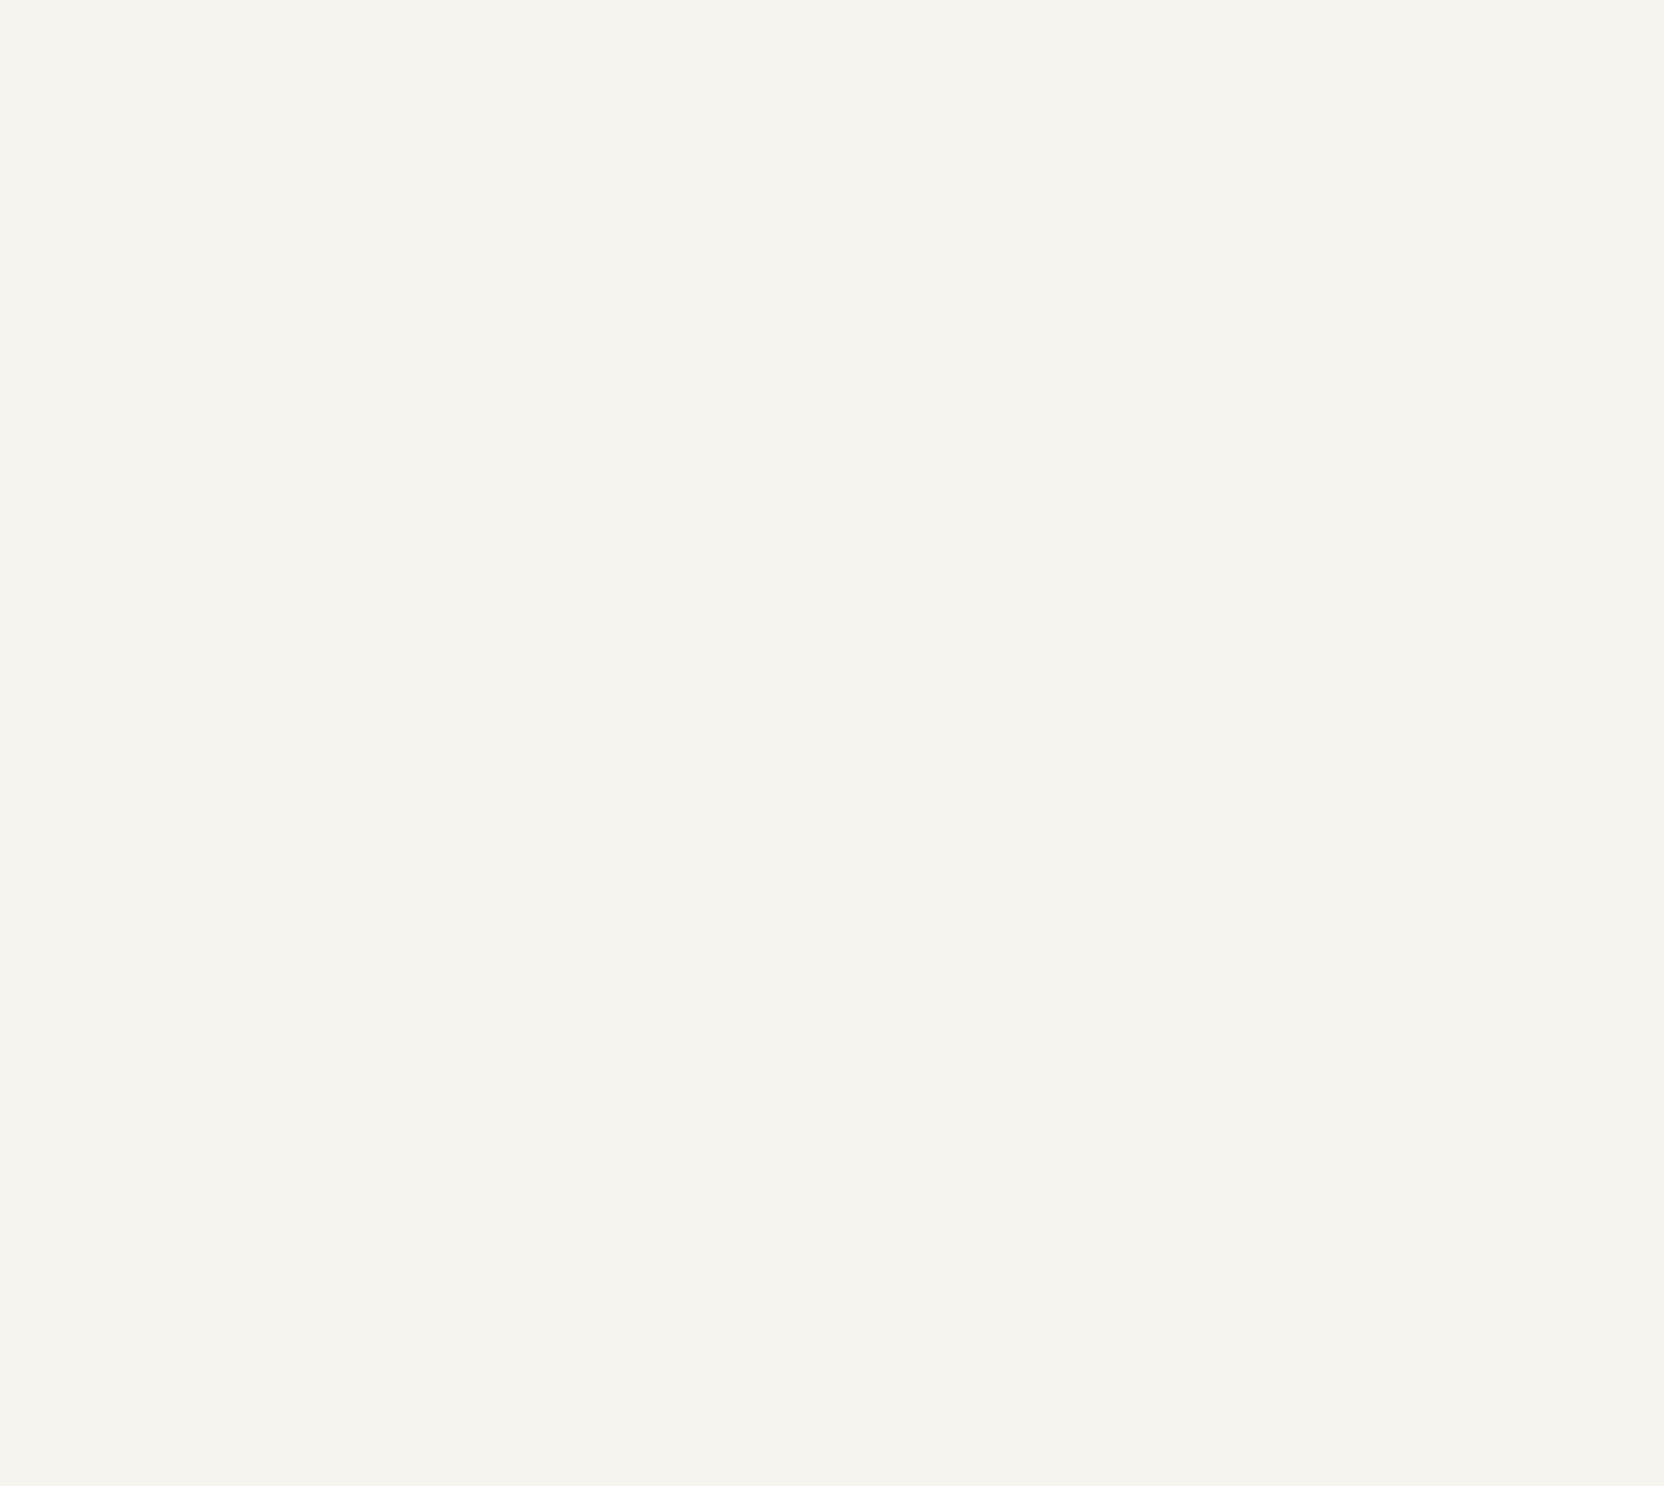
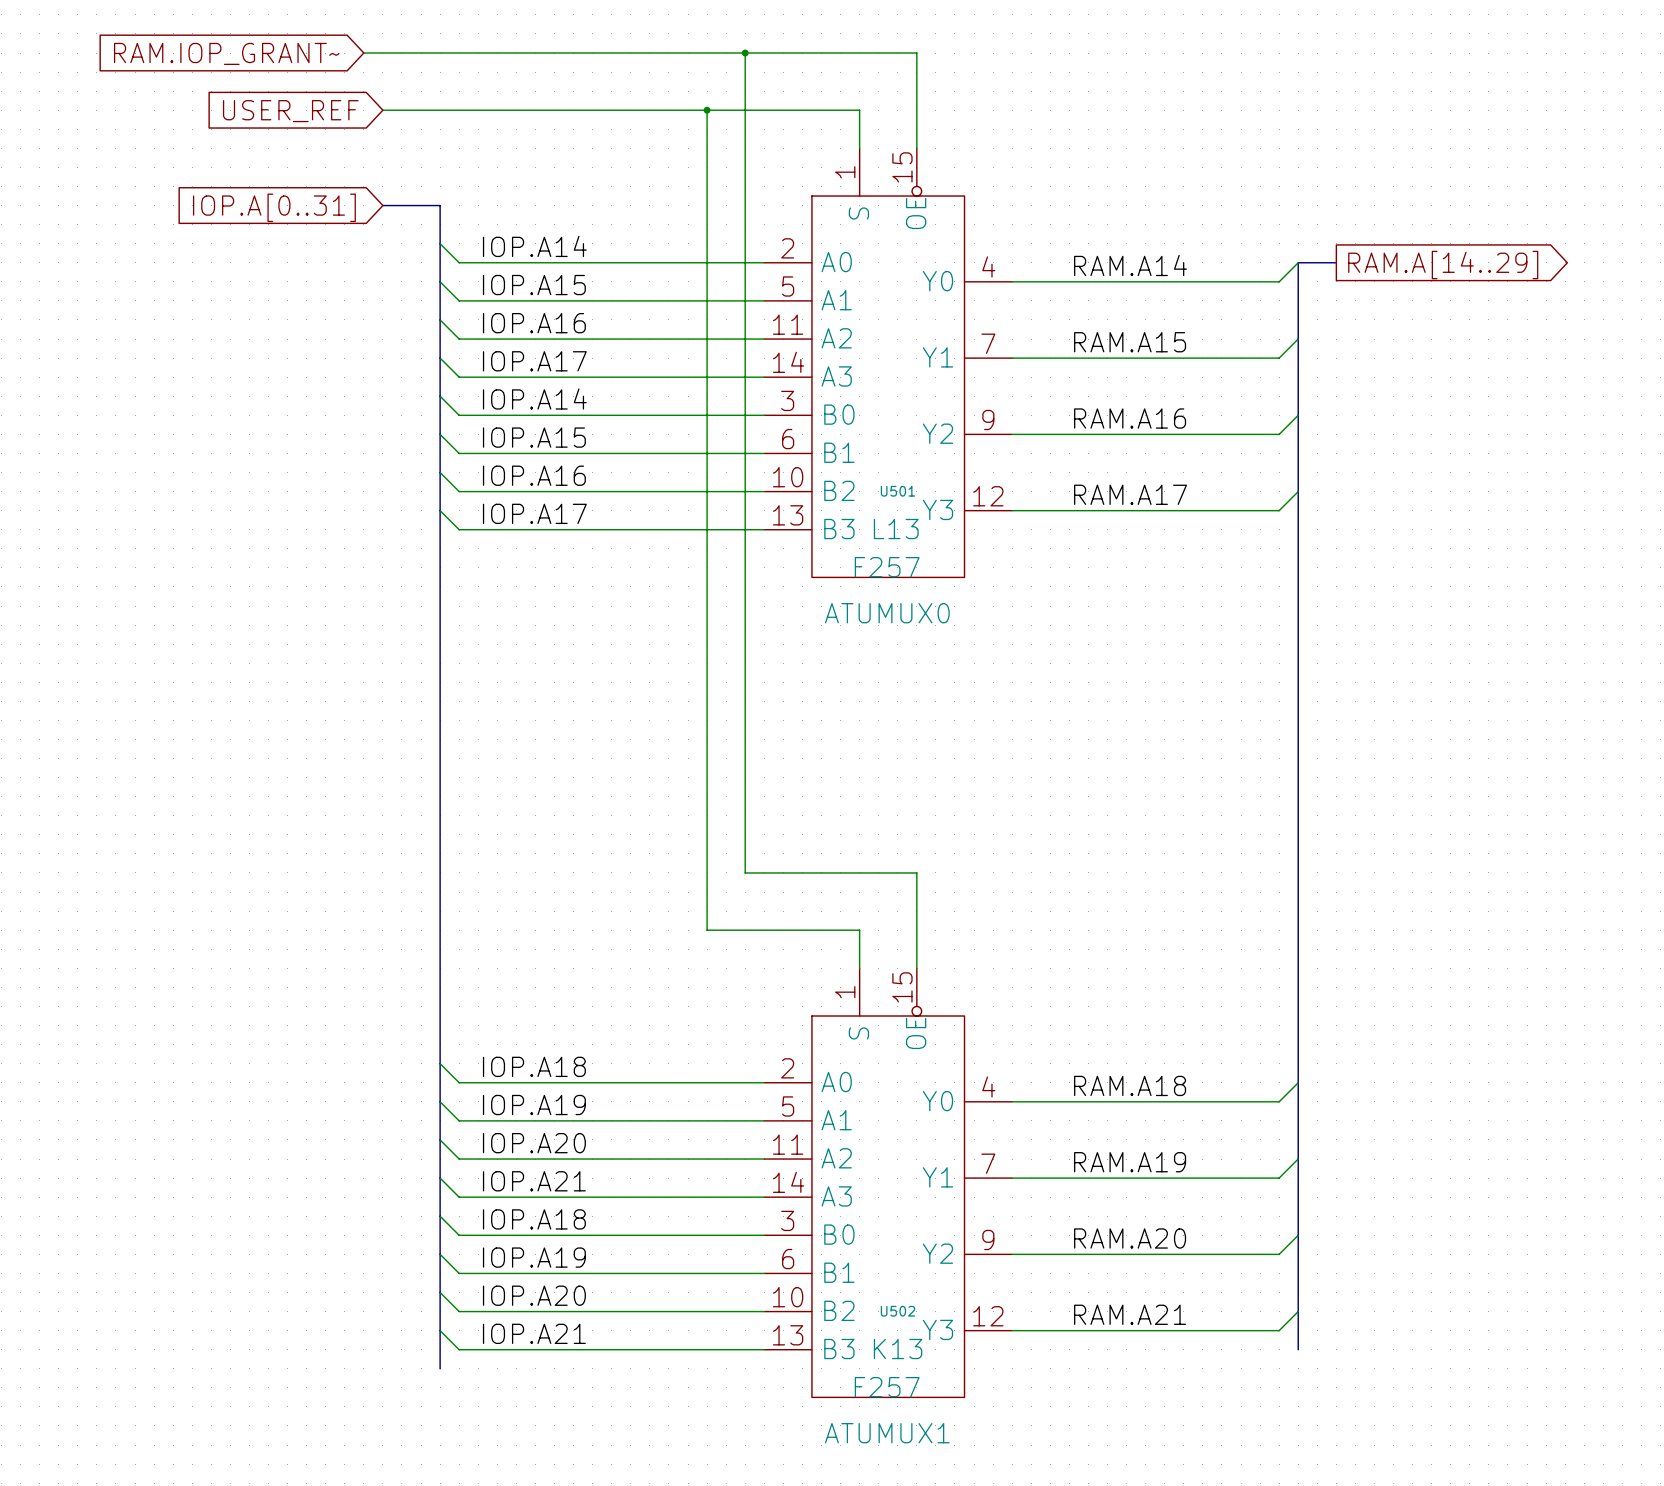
global label: none -> RAM.IOP_GRANT~ (226, 53)
wire: none -> (363, 53) (916, 53) (916, 148)
wire: none -> (745, 53) (745, 872) (916, 872) (916, 968)
junction: none -> (745, 53)
wire: none -> (382, 110) (859, 110) (859, 148)
wire: none -> (707, 110) (707, 930) (859, 930) (859, 968)
junction: none -> (707, 110)
global label: none -> USER_REF (290, 111)
bus: none -> (382, 205) (440, 205) (440, 1368)
global label: none -> IOP.A[0..31] (274, 207)
wire: none -> (440, 243) (459, 262) (764, 262)
label: none -> IOP.A14 (534, 246)
wire: none -> (1298, 262) (1279, 281) (1012, 281)
bus: none -> (1336, 262) (1298, 262) (1298, 1349)
label: none -> RAM.A14 (1130, 265)
global label: none -> RAM.A[14..29] (1443, 265)
wire: none -> (440, 281) (459, 300) (764, 300)
label: none -> IOP.A15 (534, 285)
wire: none -> (440, 319) (459, 339) (764, 339)
label: none -> IOP.A16 (534, 323)
wire: none -> (1298, 339) (1279, 358) (1012, 358)
label: none -> RAM.A15 (1130, 342)
wire: none -> (440, 358) (459, 377) (764, 377)
label: none -> IOP.A17 (534, 361)
U501: none -> F257 (888, 362)
wire: none -> (440, 396) (459, 415) (764, 415)
label: none -> IOP.A14 (534, 398)
wire: none -> (1298, 415) (1279, 434) (1012, 434)
label: none -> RAM.A16 (1130, 418)
wire: none -> (440, 434) (459, 453) (764, 453)
label: none -> IOP.A15 (534, 437)
wire: none -> (440, 472) (459, 491) (764, 491)
label: none -> IOP.A16 (534, 475)
wire: none -> (1298, 491) (1279, 510) (1012, 510)
label: none -> RAM.A17 (1130, 494)
wire: none -> (440, 510) (459, 529) (764, 529)
label: none -> IOP.A17 (534, 513)
wire: none -> (440, 1063) (459, 1082) (764, 1082)
label: none -> IOP.A18 (534, 1066)
wire: none -> (1298, 1082) (1279, 1101) (1012, 1101)
label: none -> RAM.A18 (1130, 1085)
wire: none -> (440, 1101) (459, 1120) (764, 1120)
label: none -> IOP.A19 (534, 1105)
wire: none -> (440, 1139) (459, 1159) (764, 1159)
label: none -> IOP.A20 (534, 1143)
wire: none -> (1298, 1159) (1279, 1178) (1012, 1178)
label: none -> RAM.A19 (1130, 1162)
wire: none -> (440, 1178) (459, 1197) (764, 1197)
label: none -> IOP.A21 (534, 1181)
U502: none -> F257 (888, 1182)
wire: none -> (440, 1216) (459, 1235) (764, 1235)
label: none -> IOP.A18 (534, 1219)
wire: none -> (1298, 1235) (1279, 1254) (1012, 1254)
label: none -> RAM.A20 (1130, 1238)
wire: none -> (440, 1254) (459, 1273) (764, 1273)
label: none -> IOP.A19 (534, 1257)
wire: none -> (440, 1292) (459, 1311) (764, 1311)
label: none -> IOP.A20 (534, 1295)
wire: none -> (1298, 1311) (1279, 1330) (1012, 1330)
label: none -> RAM.A21 (1130, 1314)
wire: none -> (440, 1330) (459, 1349) (764, 1349)
label: none -> IOP.A21 (534, 1333)

